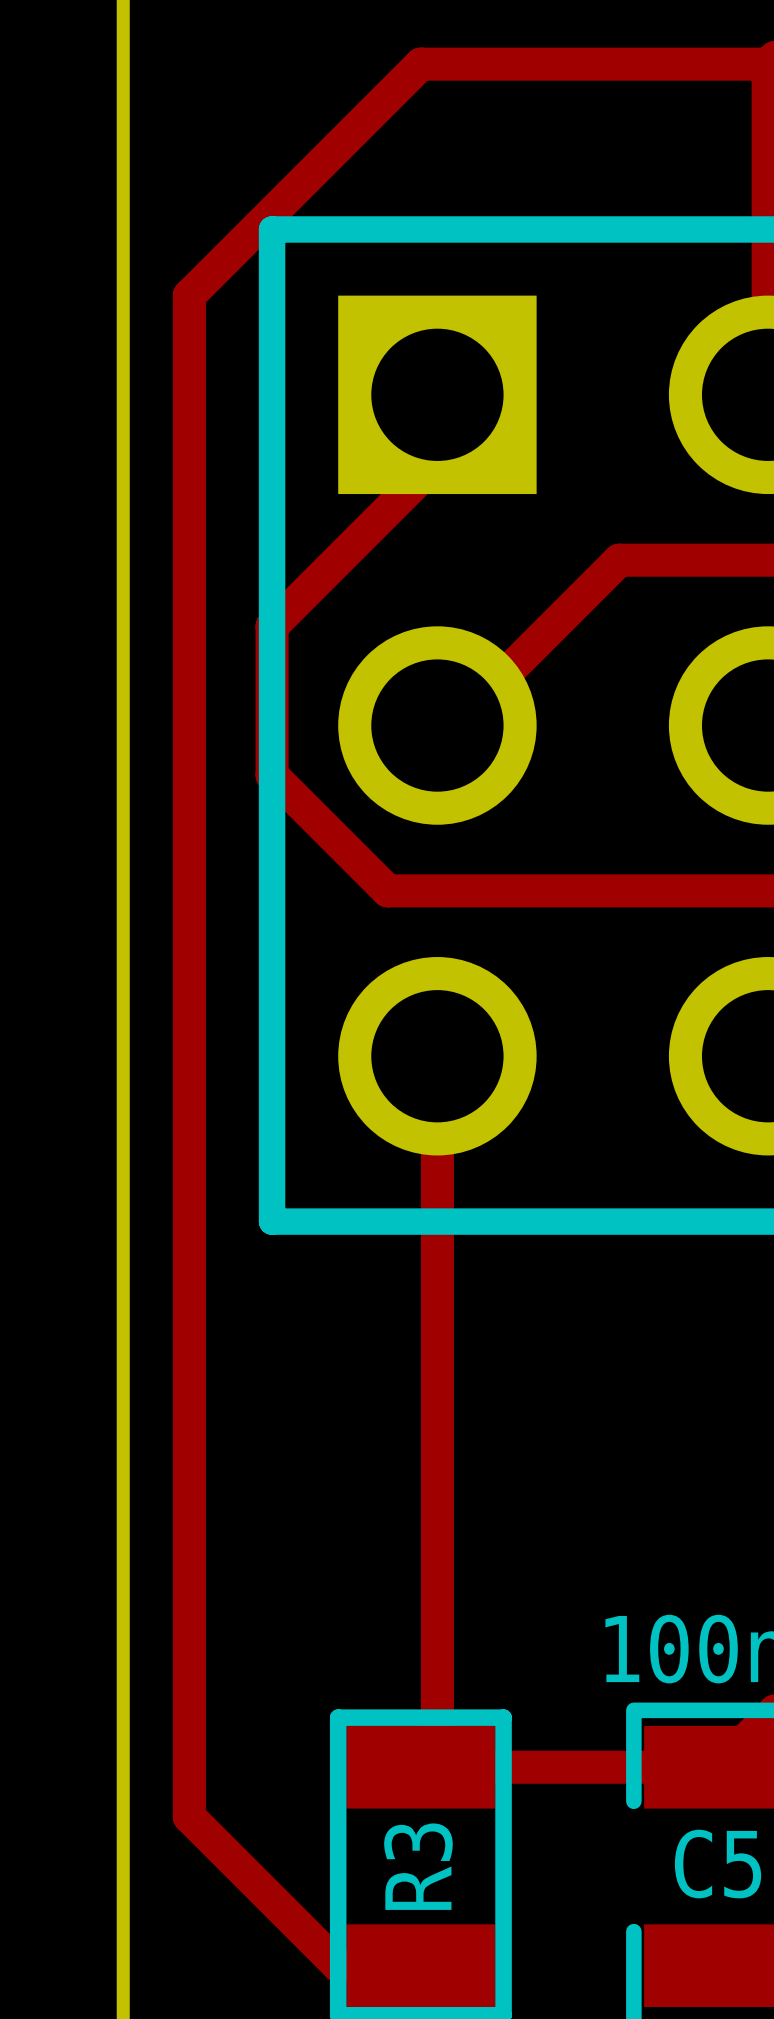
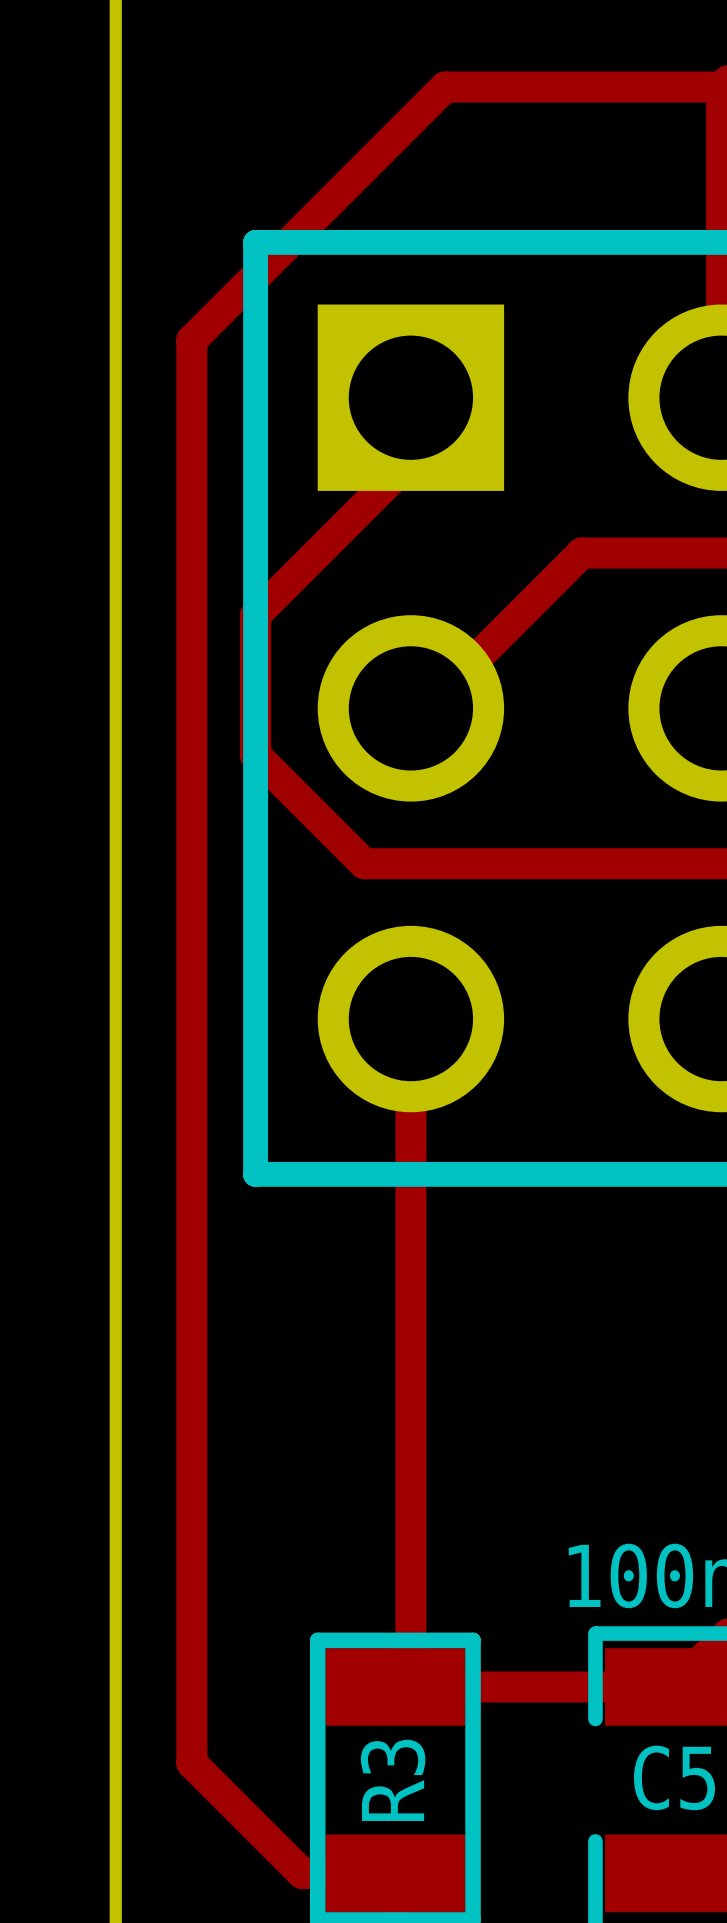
track: (473, 64) (420, 64) (189, 295) (189, 1816) (338, 1965) -> (445, 87) (191, 340) (191, 1763) (302, 1873) (317, 1873)

